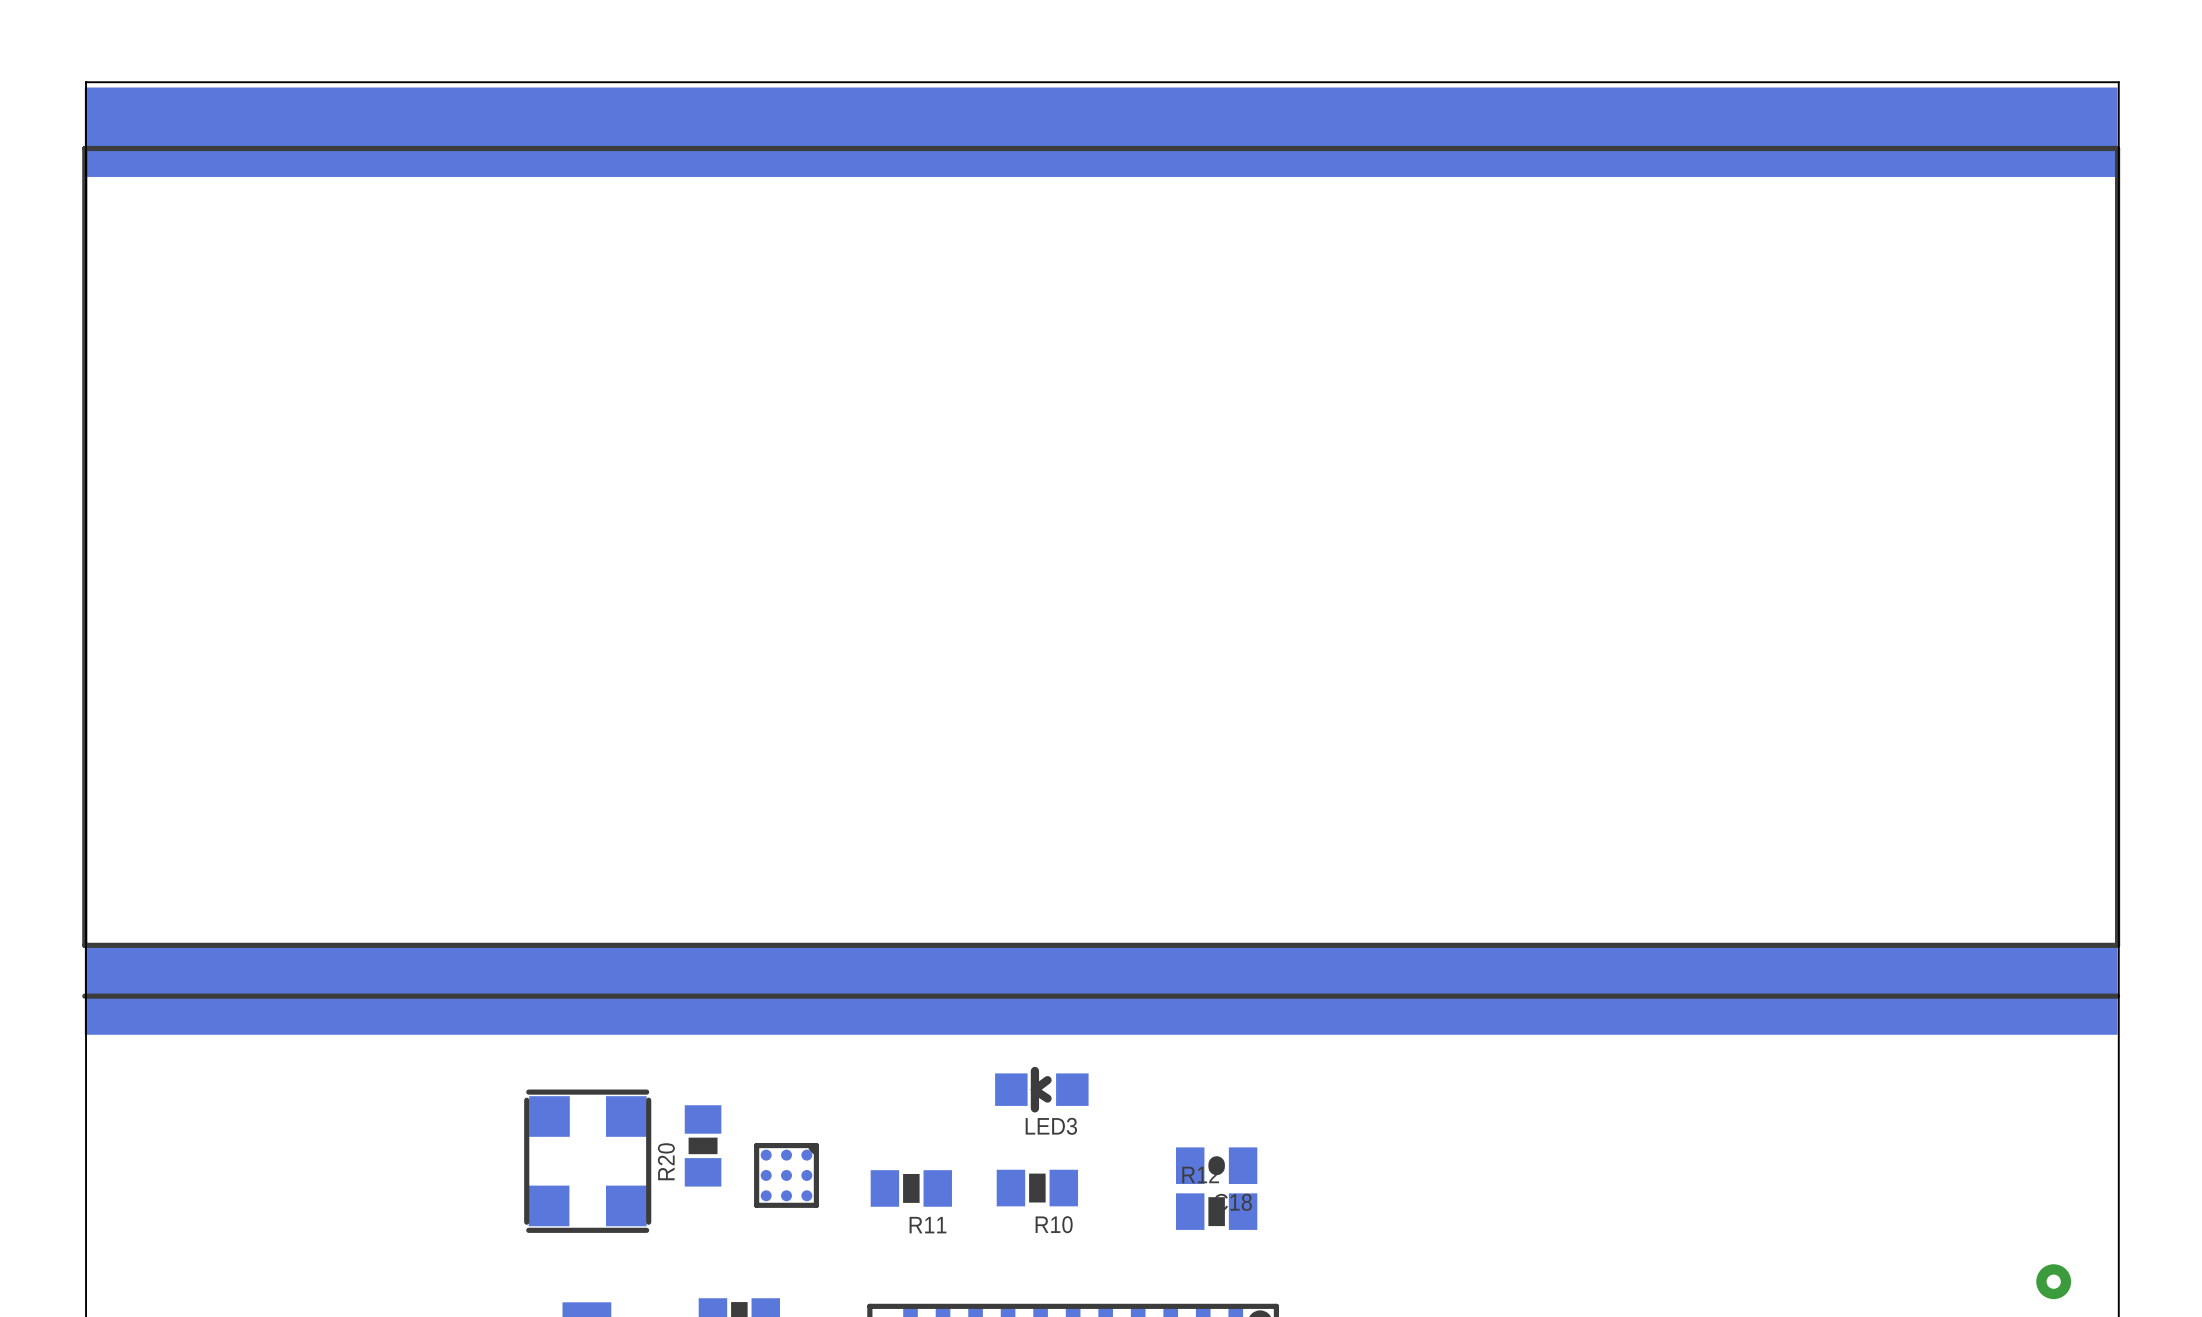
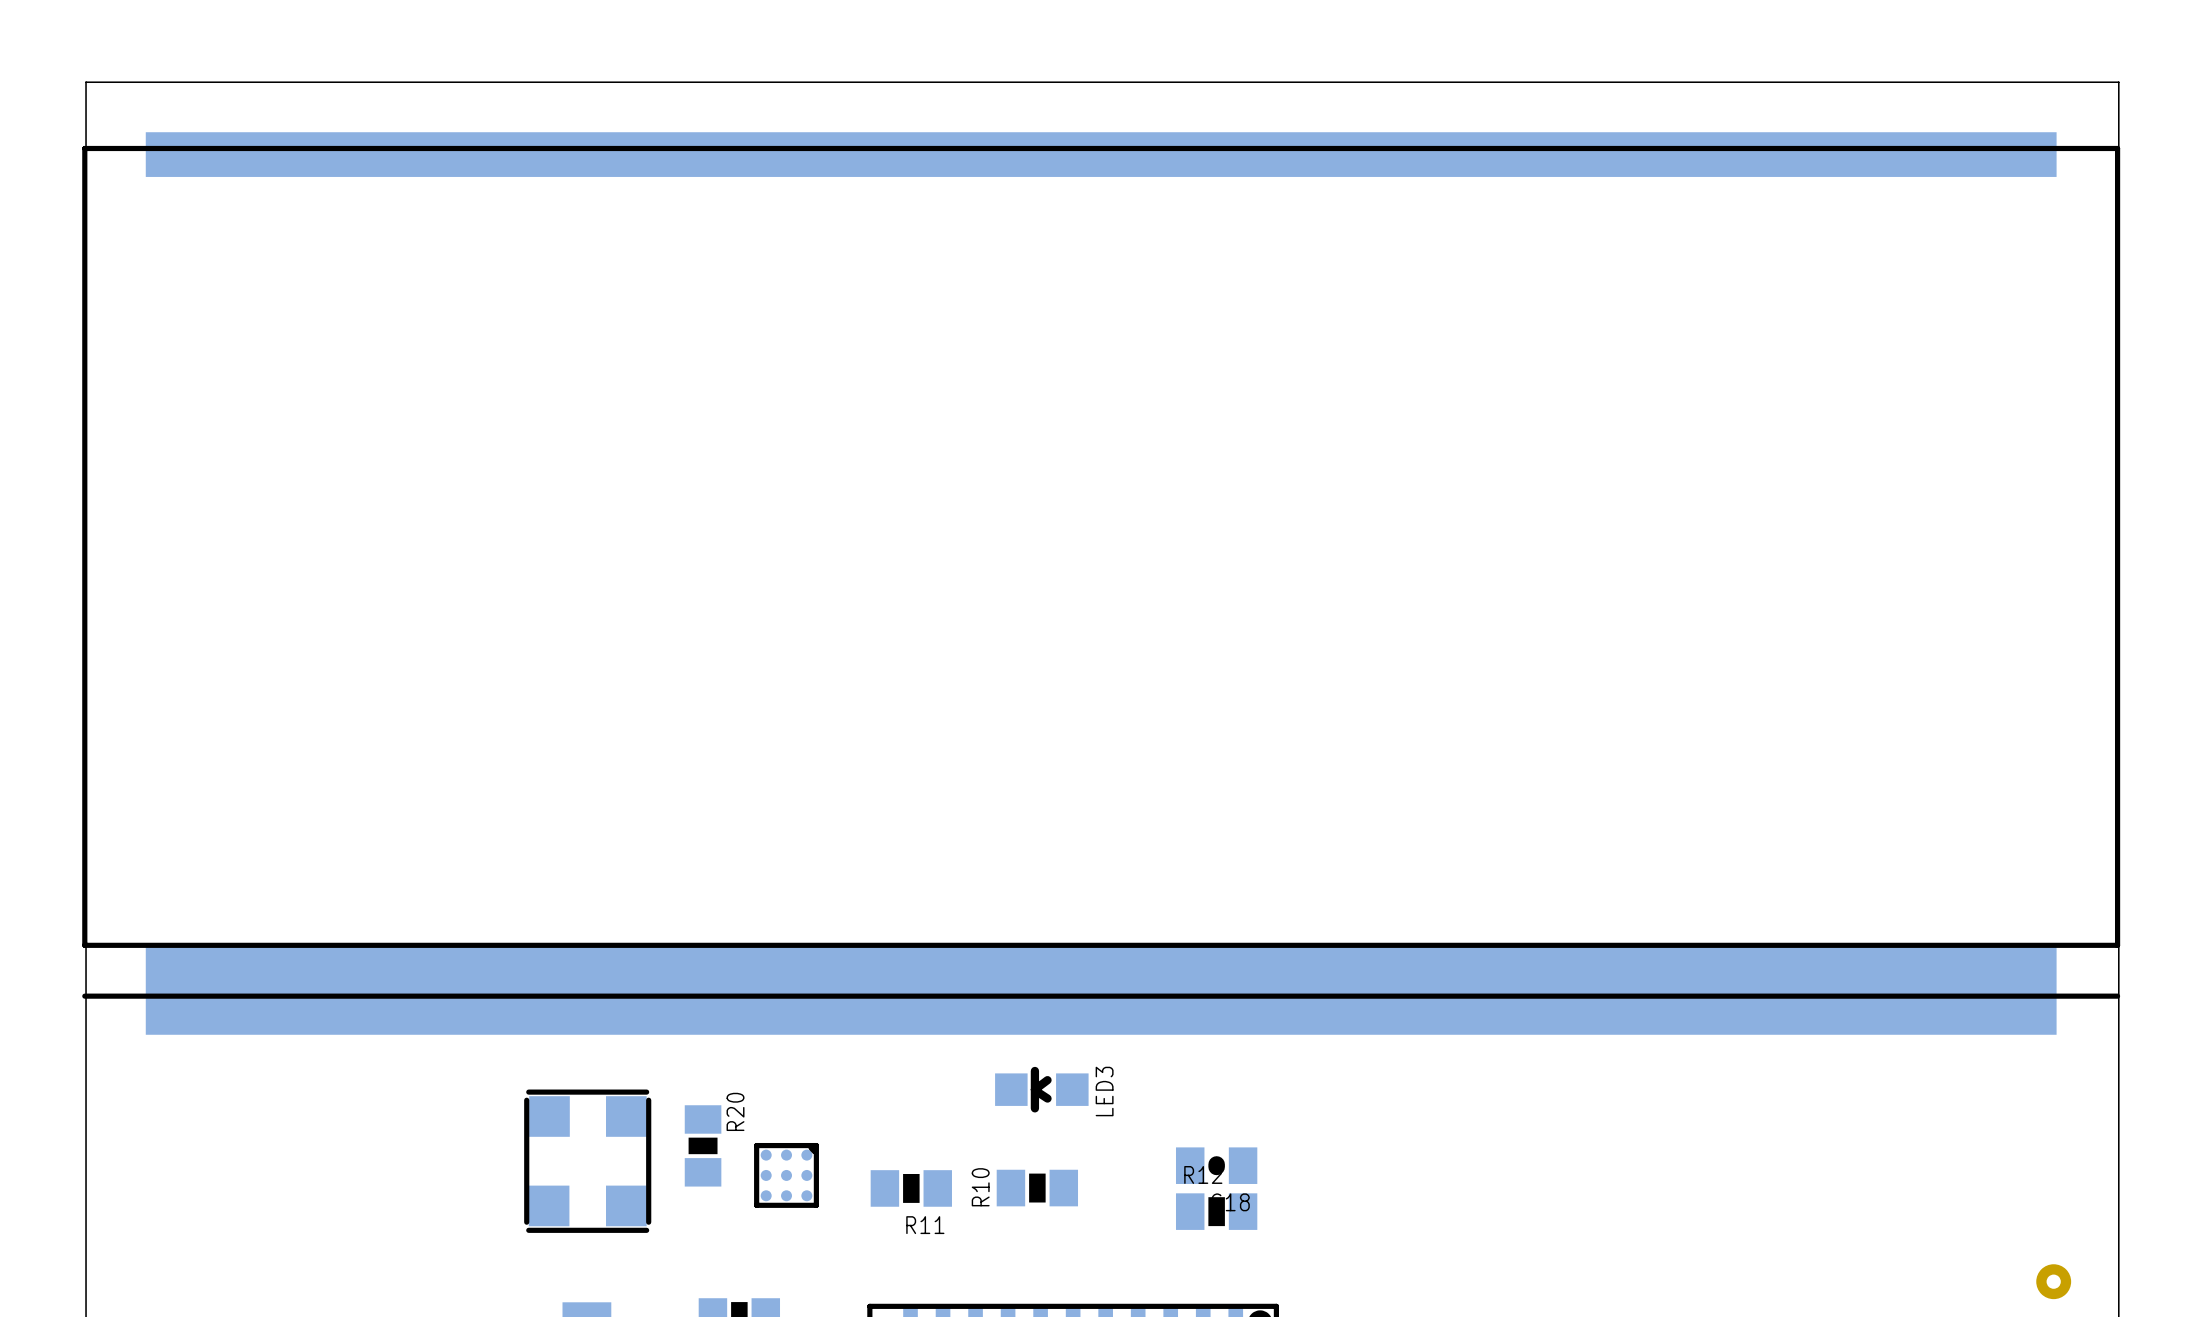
part footprint: [82, 87, 2121, 1035] -> [82, 132, 2121, 1035]
LED3 name rotation: 0° (1051, 1126) -> 90° counterclockwise (1104, 1091)
LED3 name position: LED3 (1051, 1126) -> LED3 (1104, 1091)
R20 name position: R20 (666, 1161) -> R20 (735, 1111)
R10 name rotation: 0° (1054, 1224) -> 90° counterclockwise (980, 1187)
R10 name position: R10 (1054, 1224) -> R10 (980, 1187)

